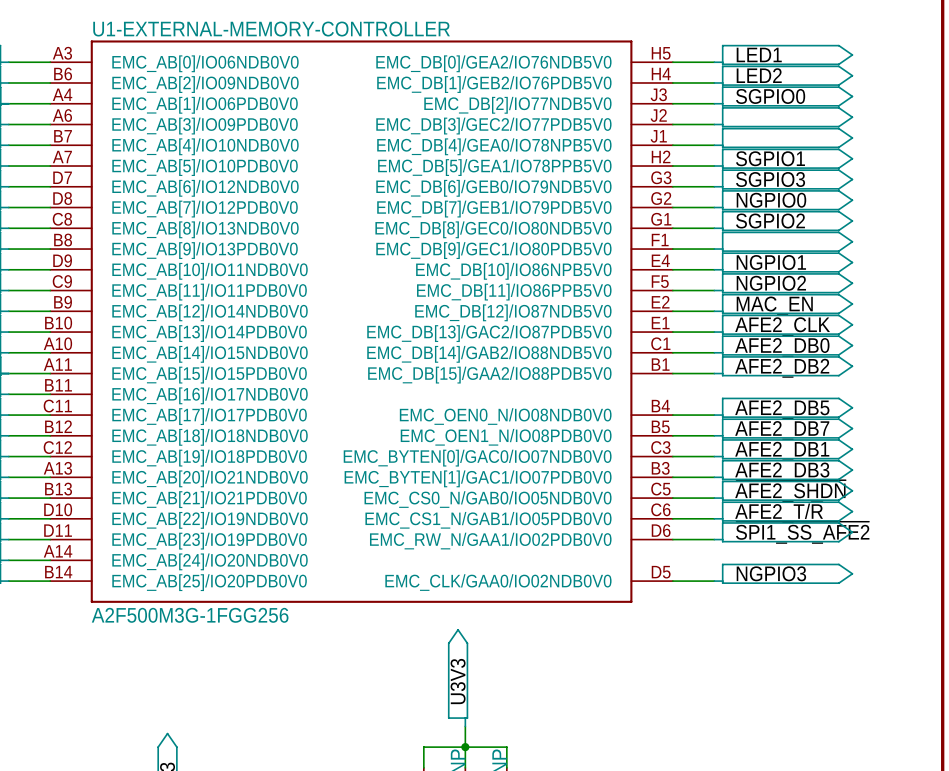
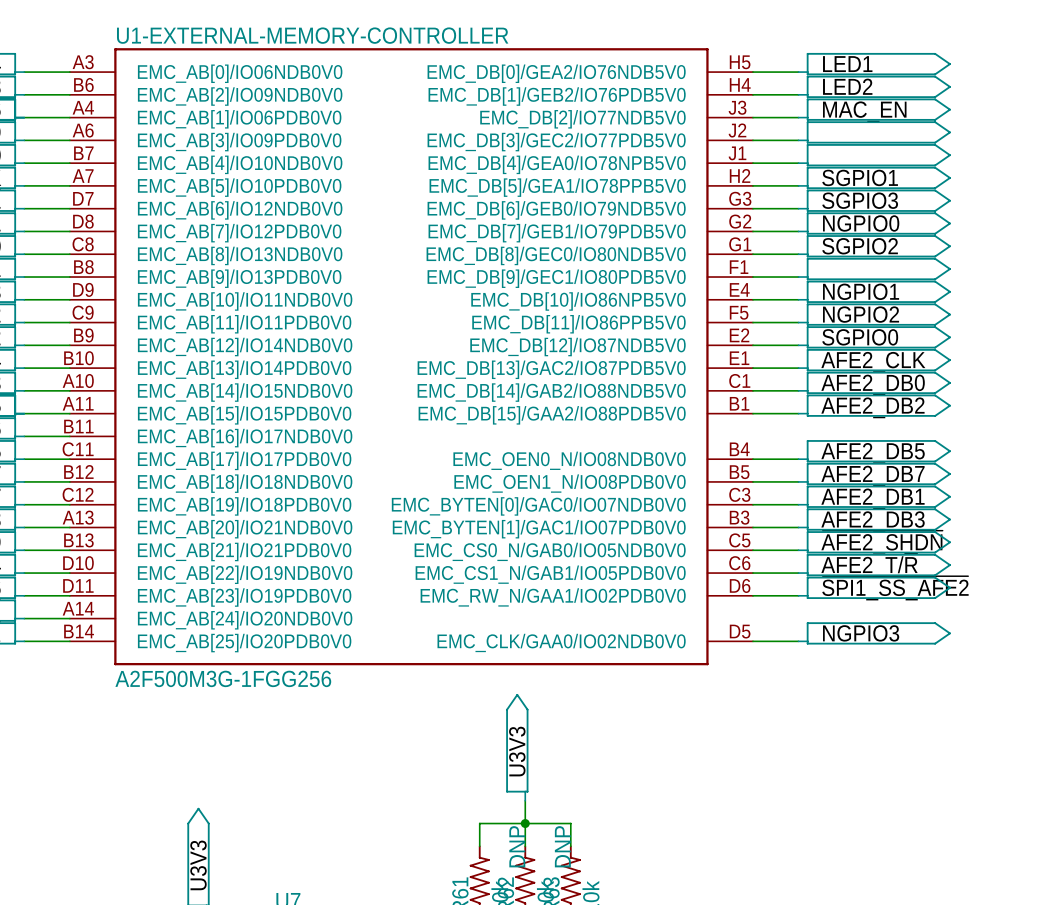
label: SGPIO0 (770, 96) -> MAC_EN (864, 111)
label: MAC_EN (774, 306) -> SGPIO0 (860, 337)

